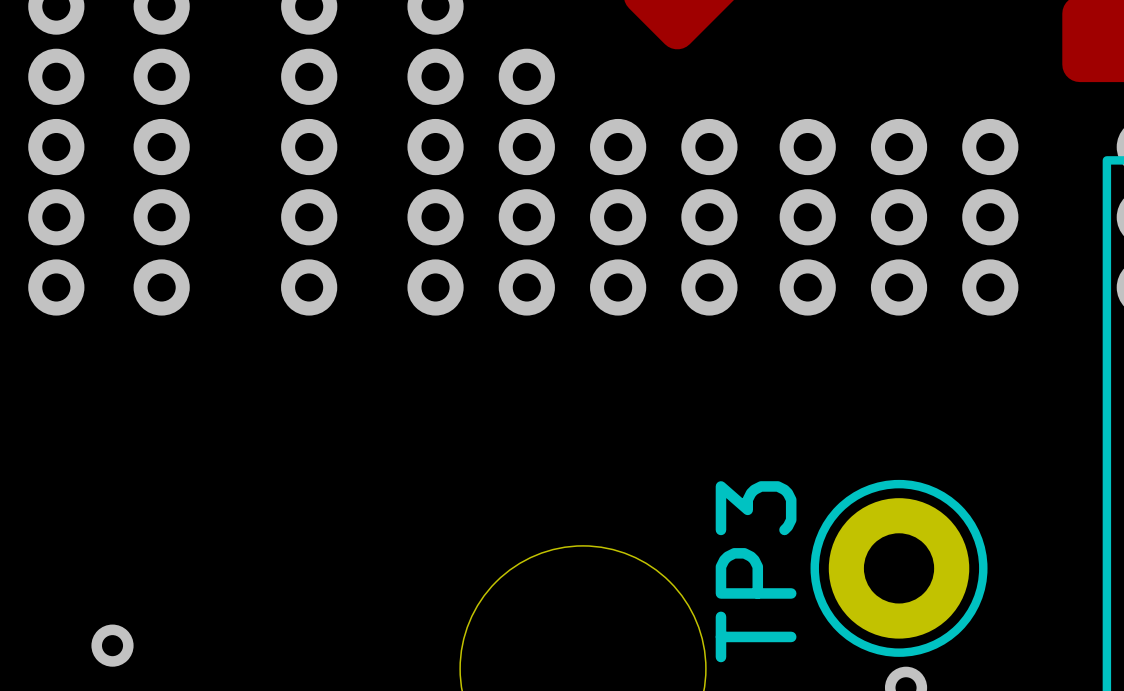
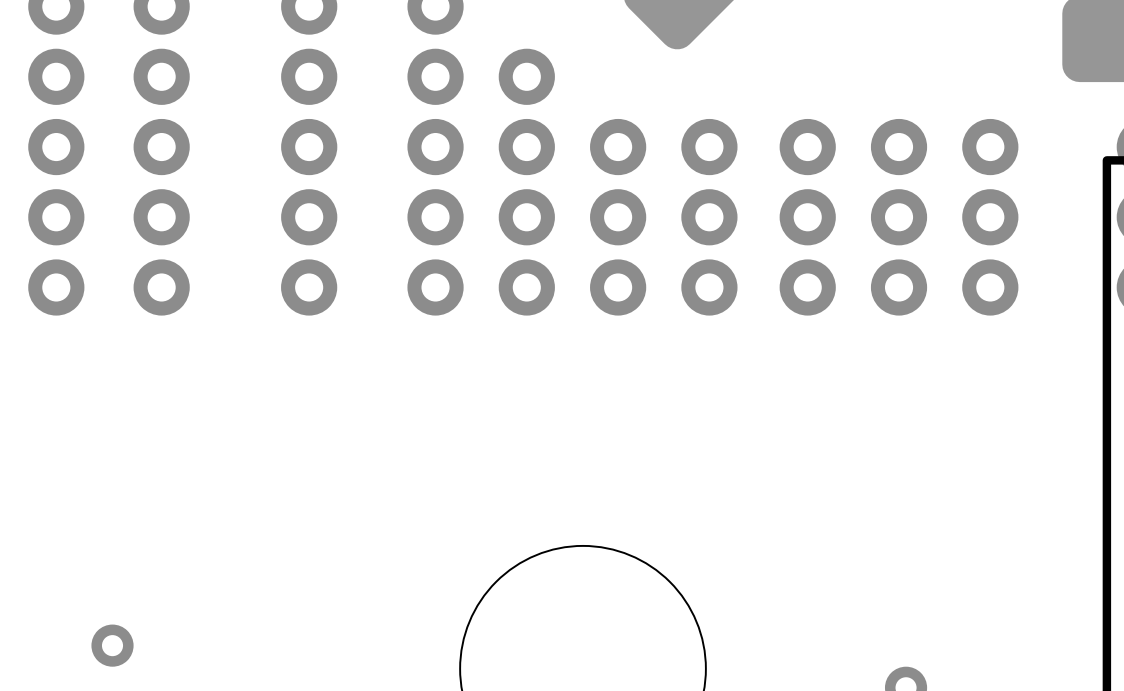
TP3: (899, 568) -> none

